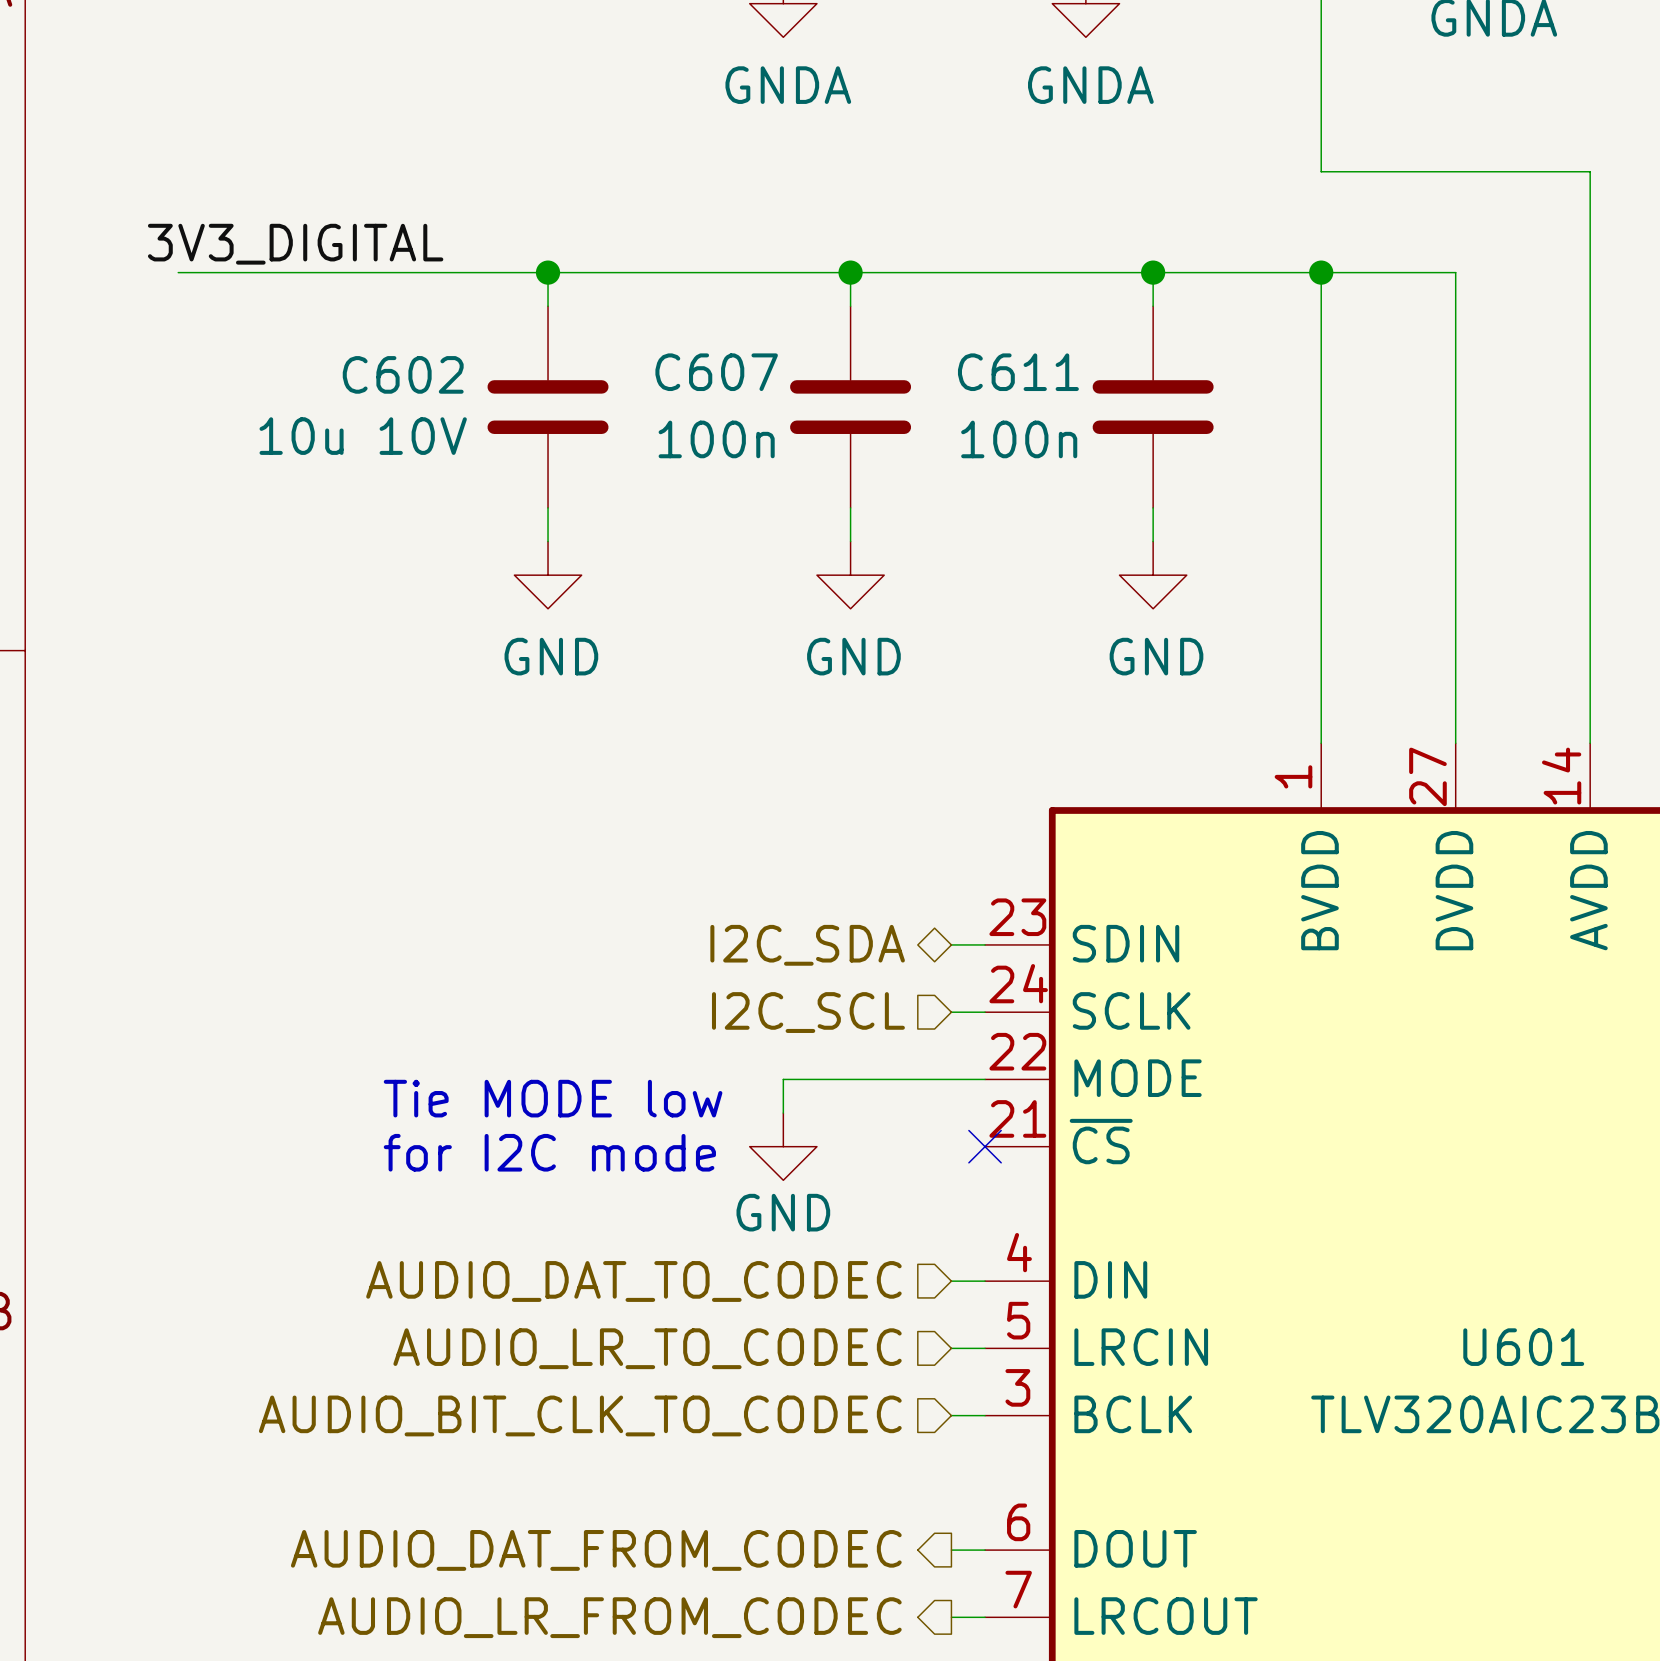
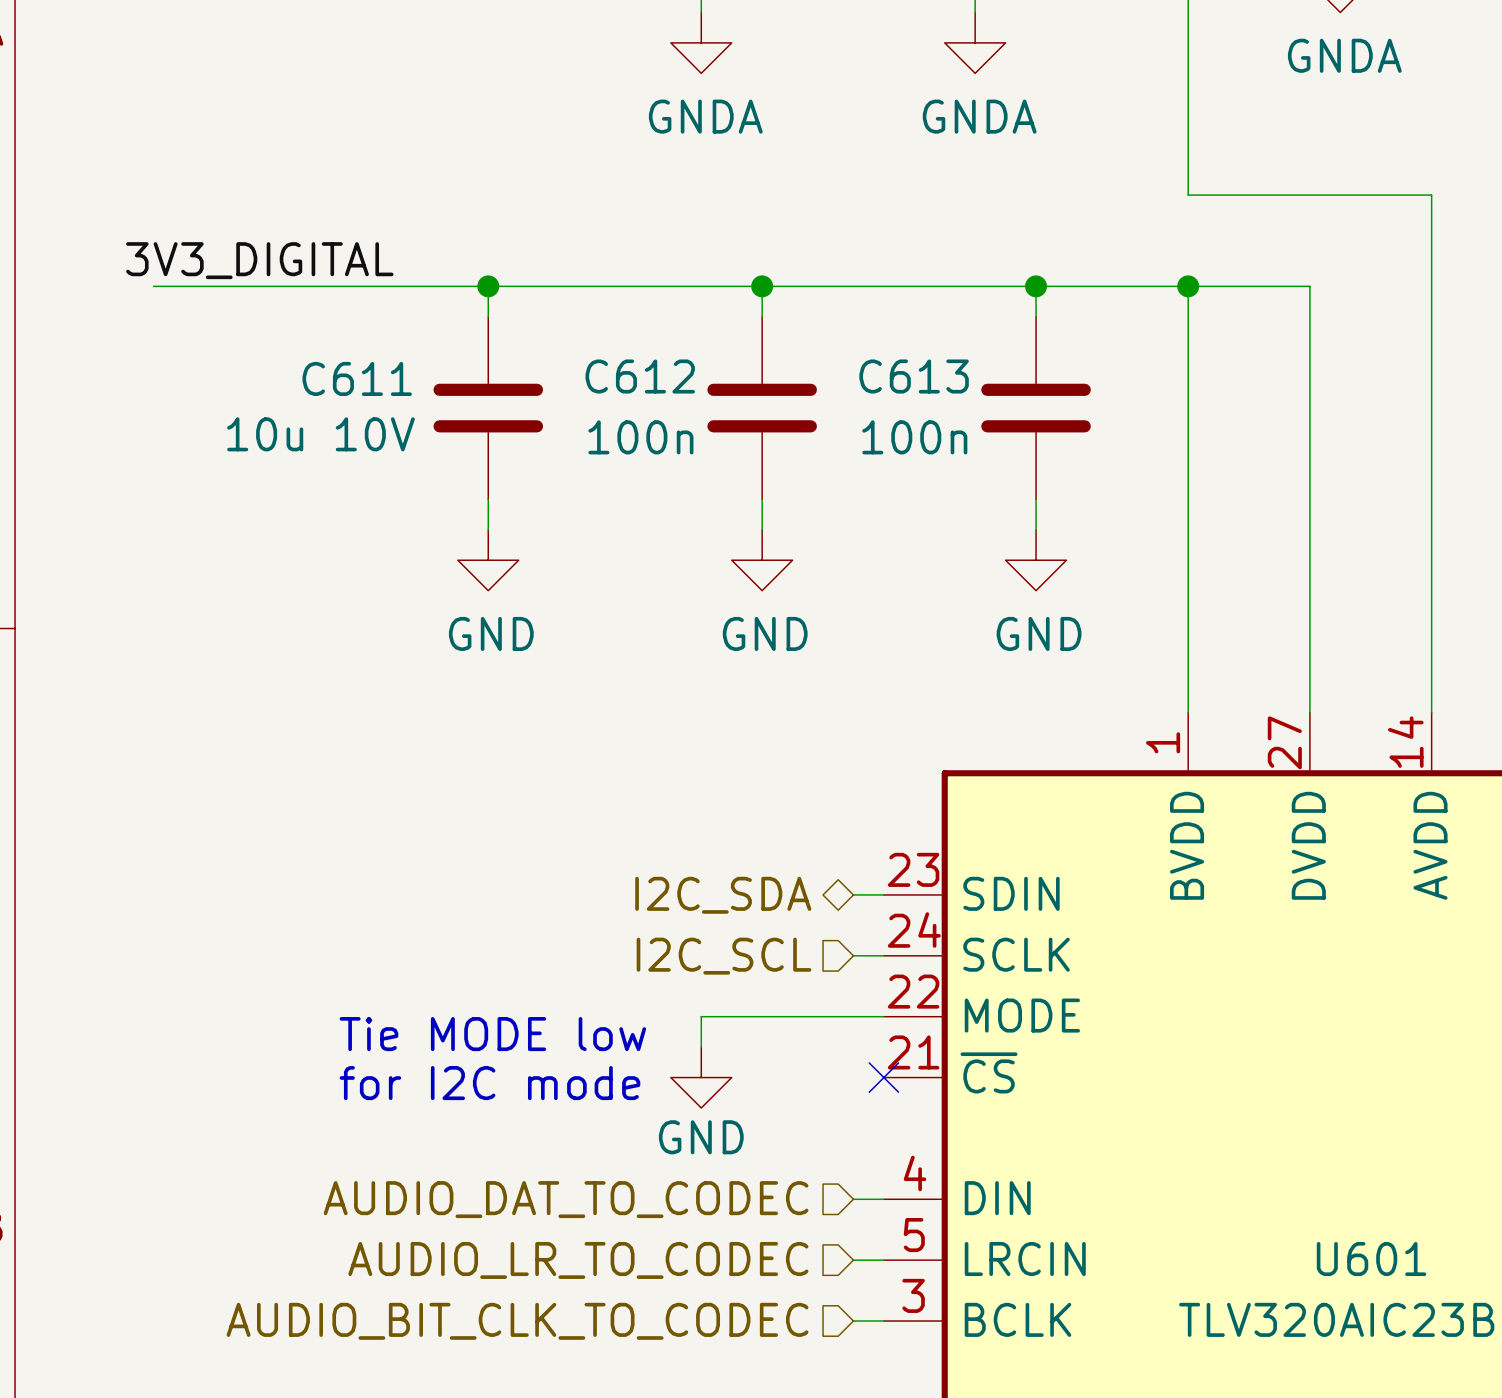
C607 name: C607 (716, 372) -> C612 (640, 376)
C611 name: C611 (1018, 372) -> C613 (914, 376)
C602 name: C602 (403, 374) -> C611 (357, 378)

